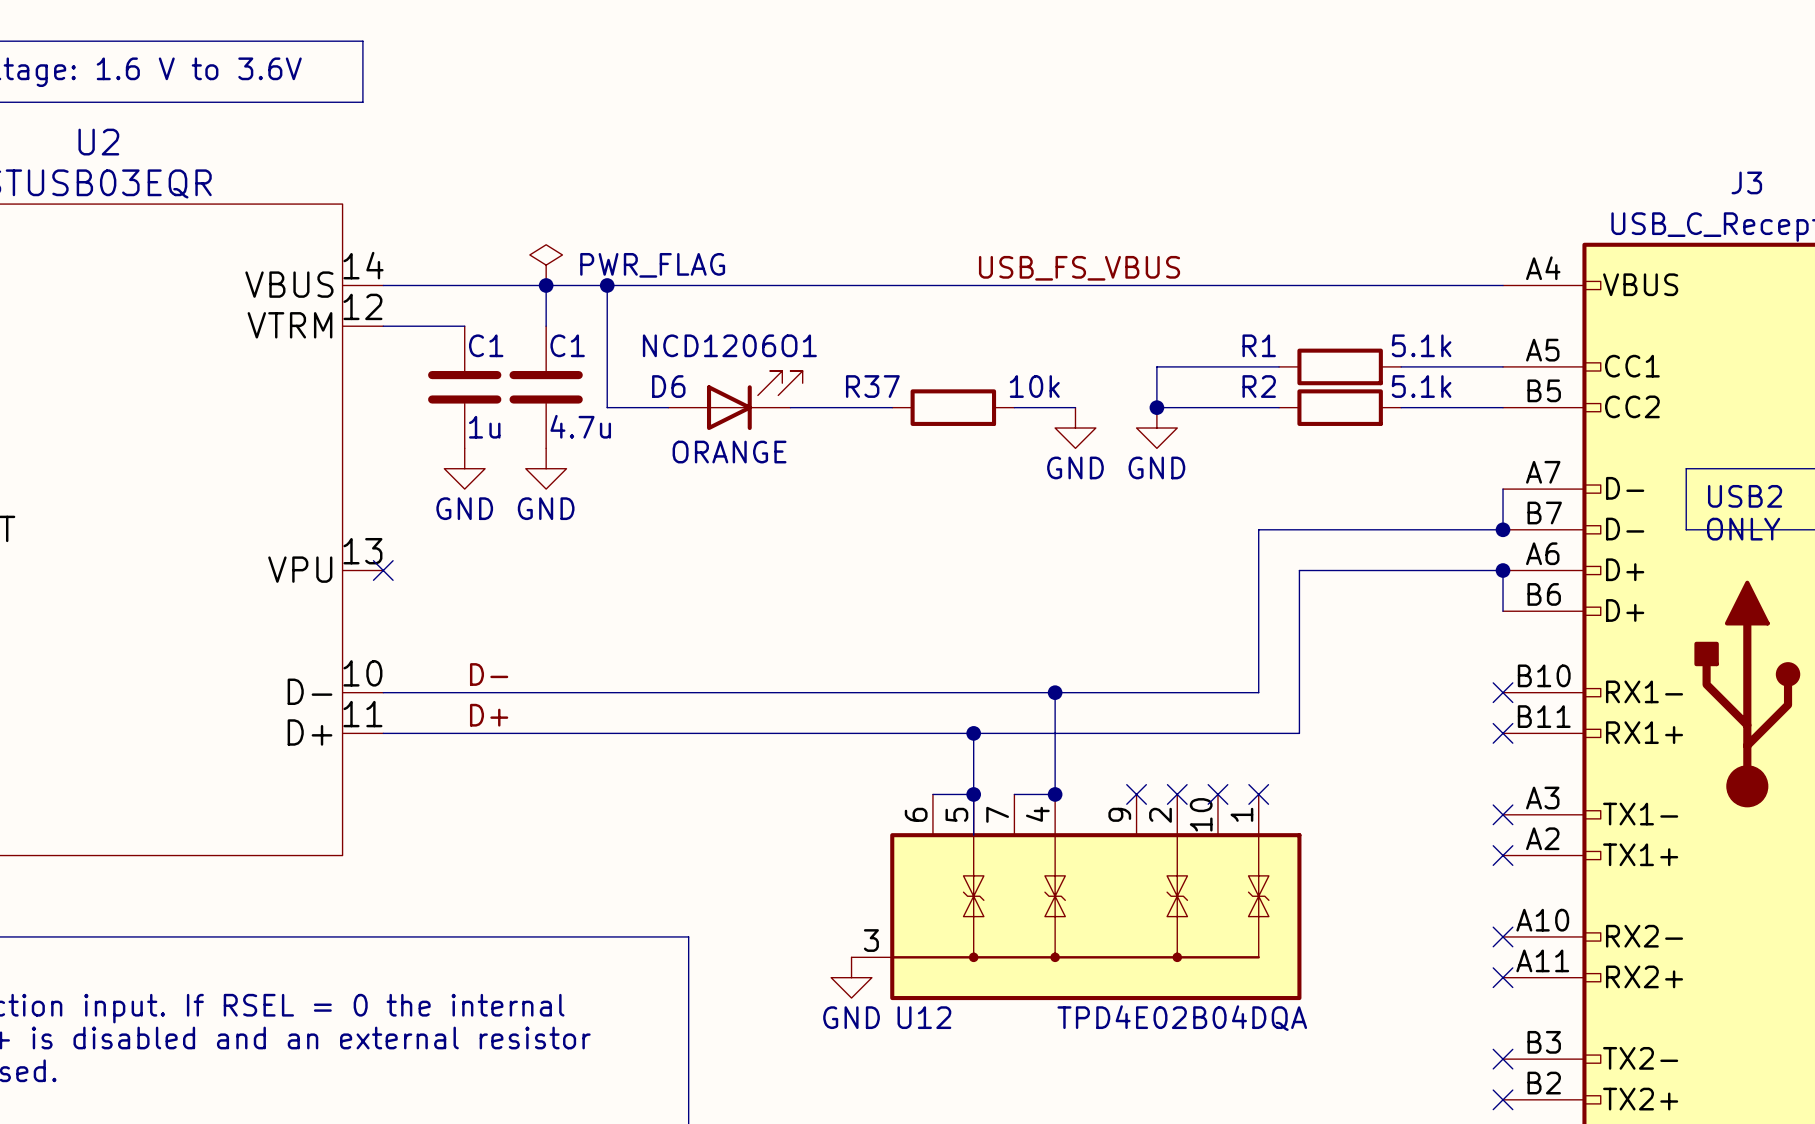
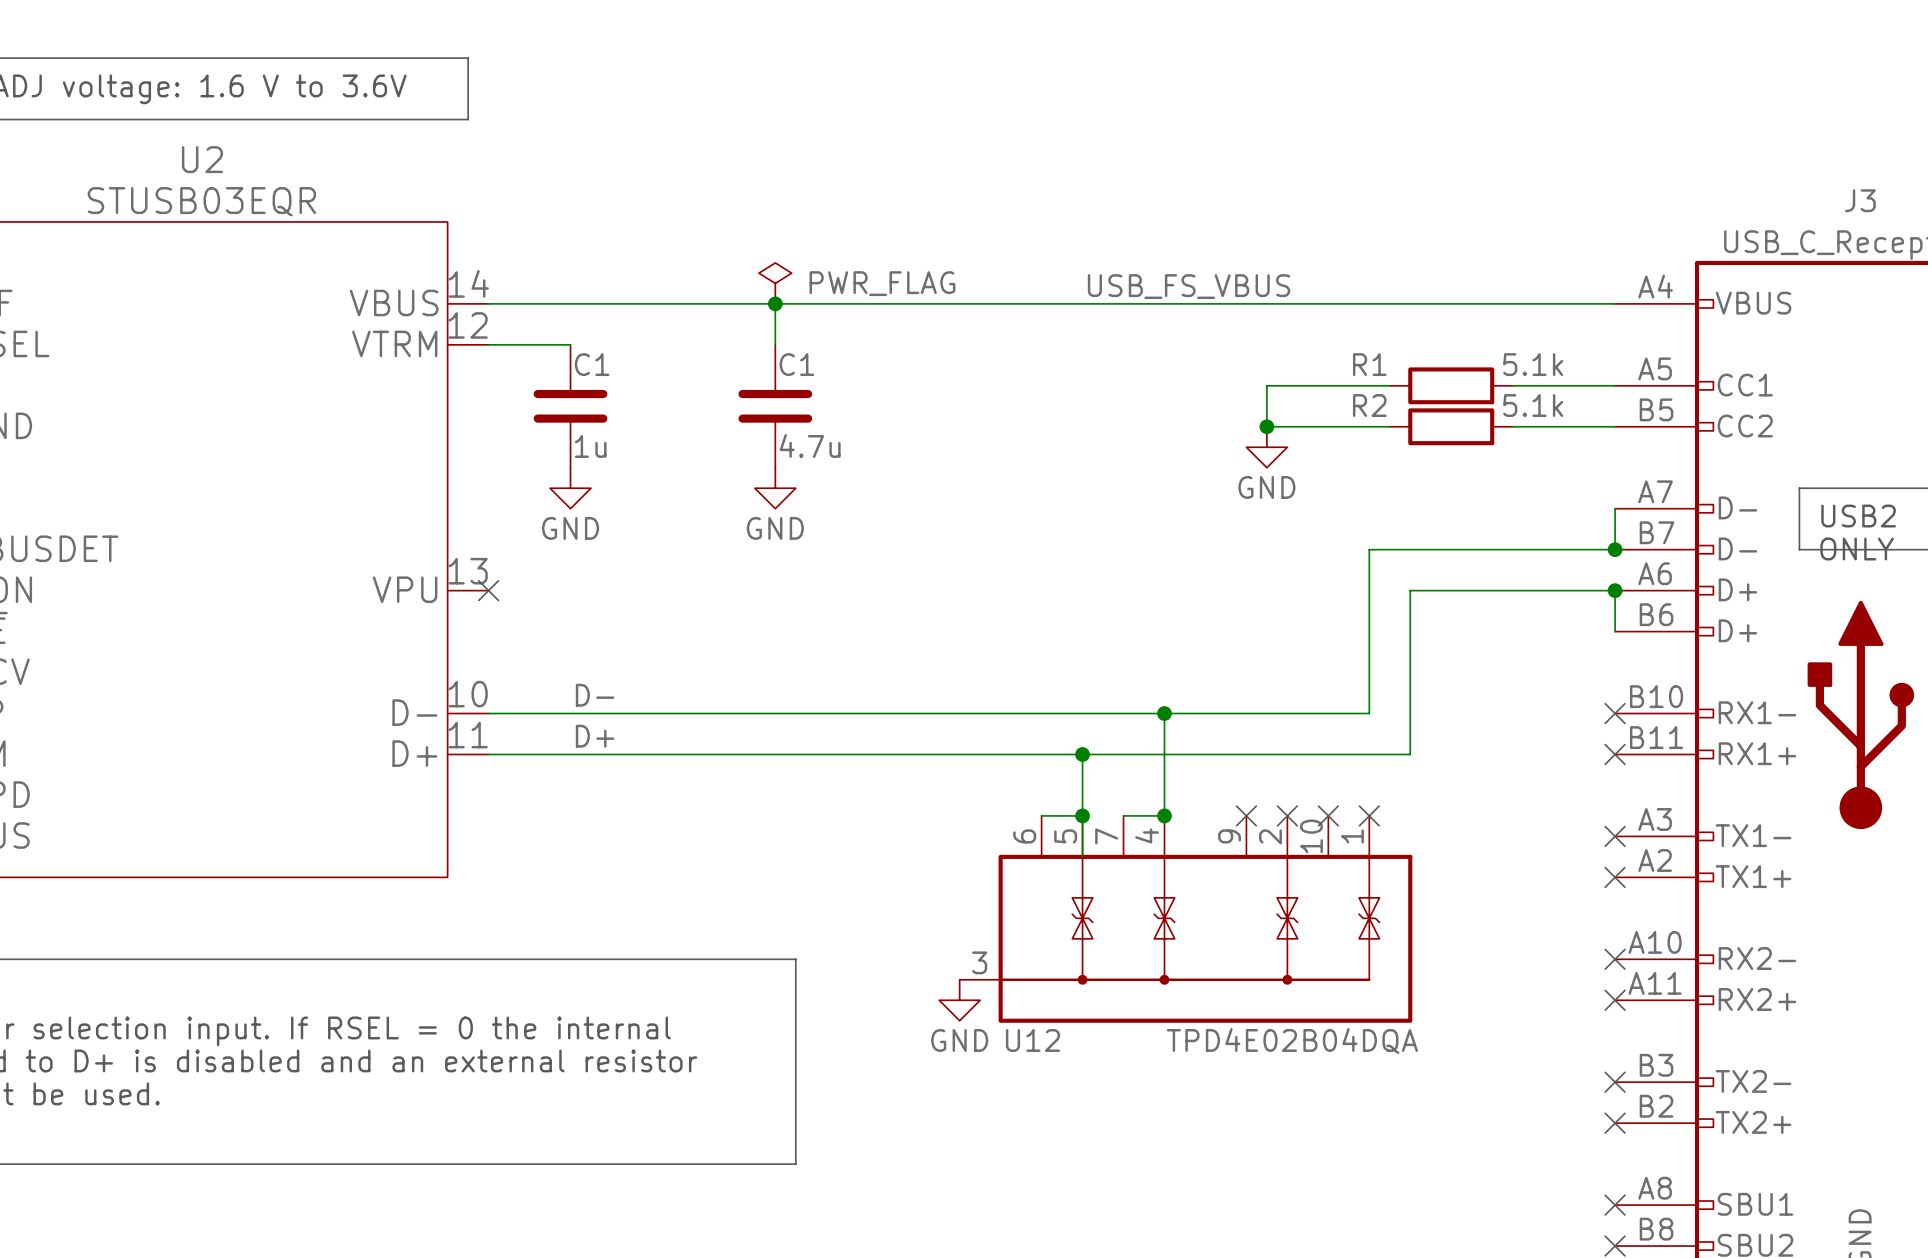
power symbol position: PWR_FLAG (546, 265) -> PWR_FLAG (775, 283)
wire: (546, 285) (546, 326) -> (775, 303) (775, 344)
junction: (546, 285) -> none
wire: (607, 285) (607, 407) (668, 407) -> none
junction: (607, 285) -> none
junction: none -> (775, 303)
C1 position: (546, 387) -> (775, 406)
D6: NCD1206O1 (735, 400) -> none
wire: (790, 407) (892, 407) -> none
R37: 10k (953, 407) -> none
wire: (1014, 407) (1075, 407) -> none
power symbol: GND (1075, 428) -> none
text: ORANGE (729, 452) -> none
power symbol position: GND (546, 468) -> GND (775, 488)

